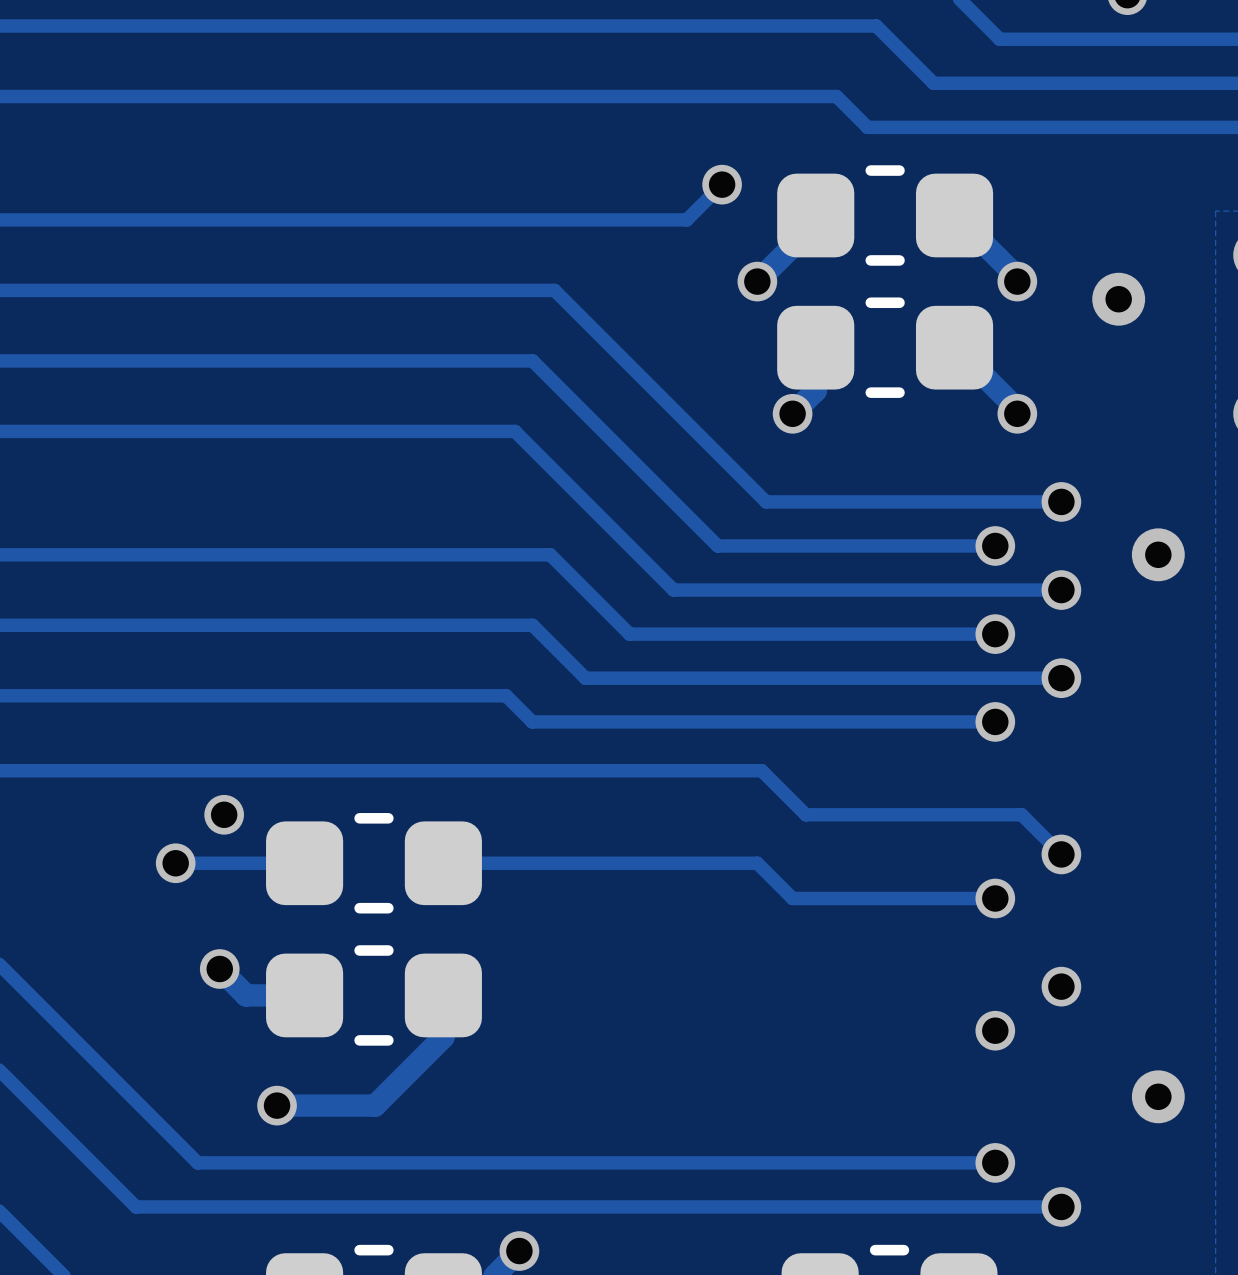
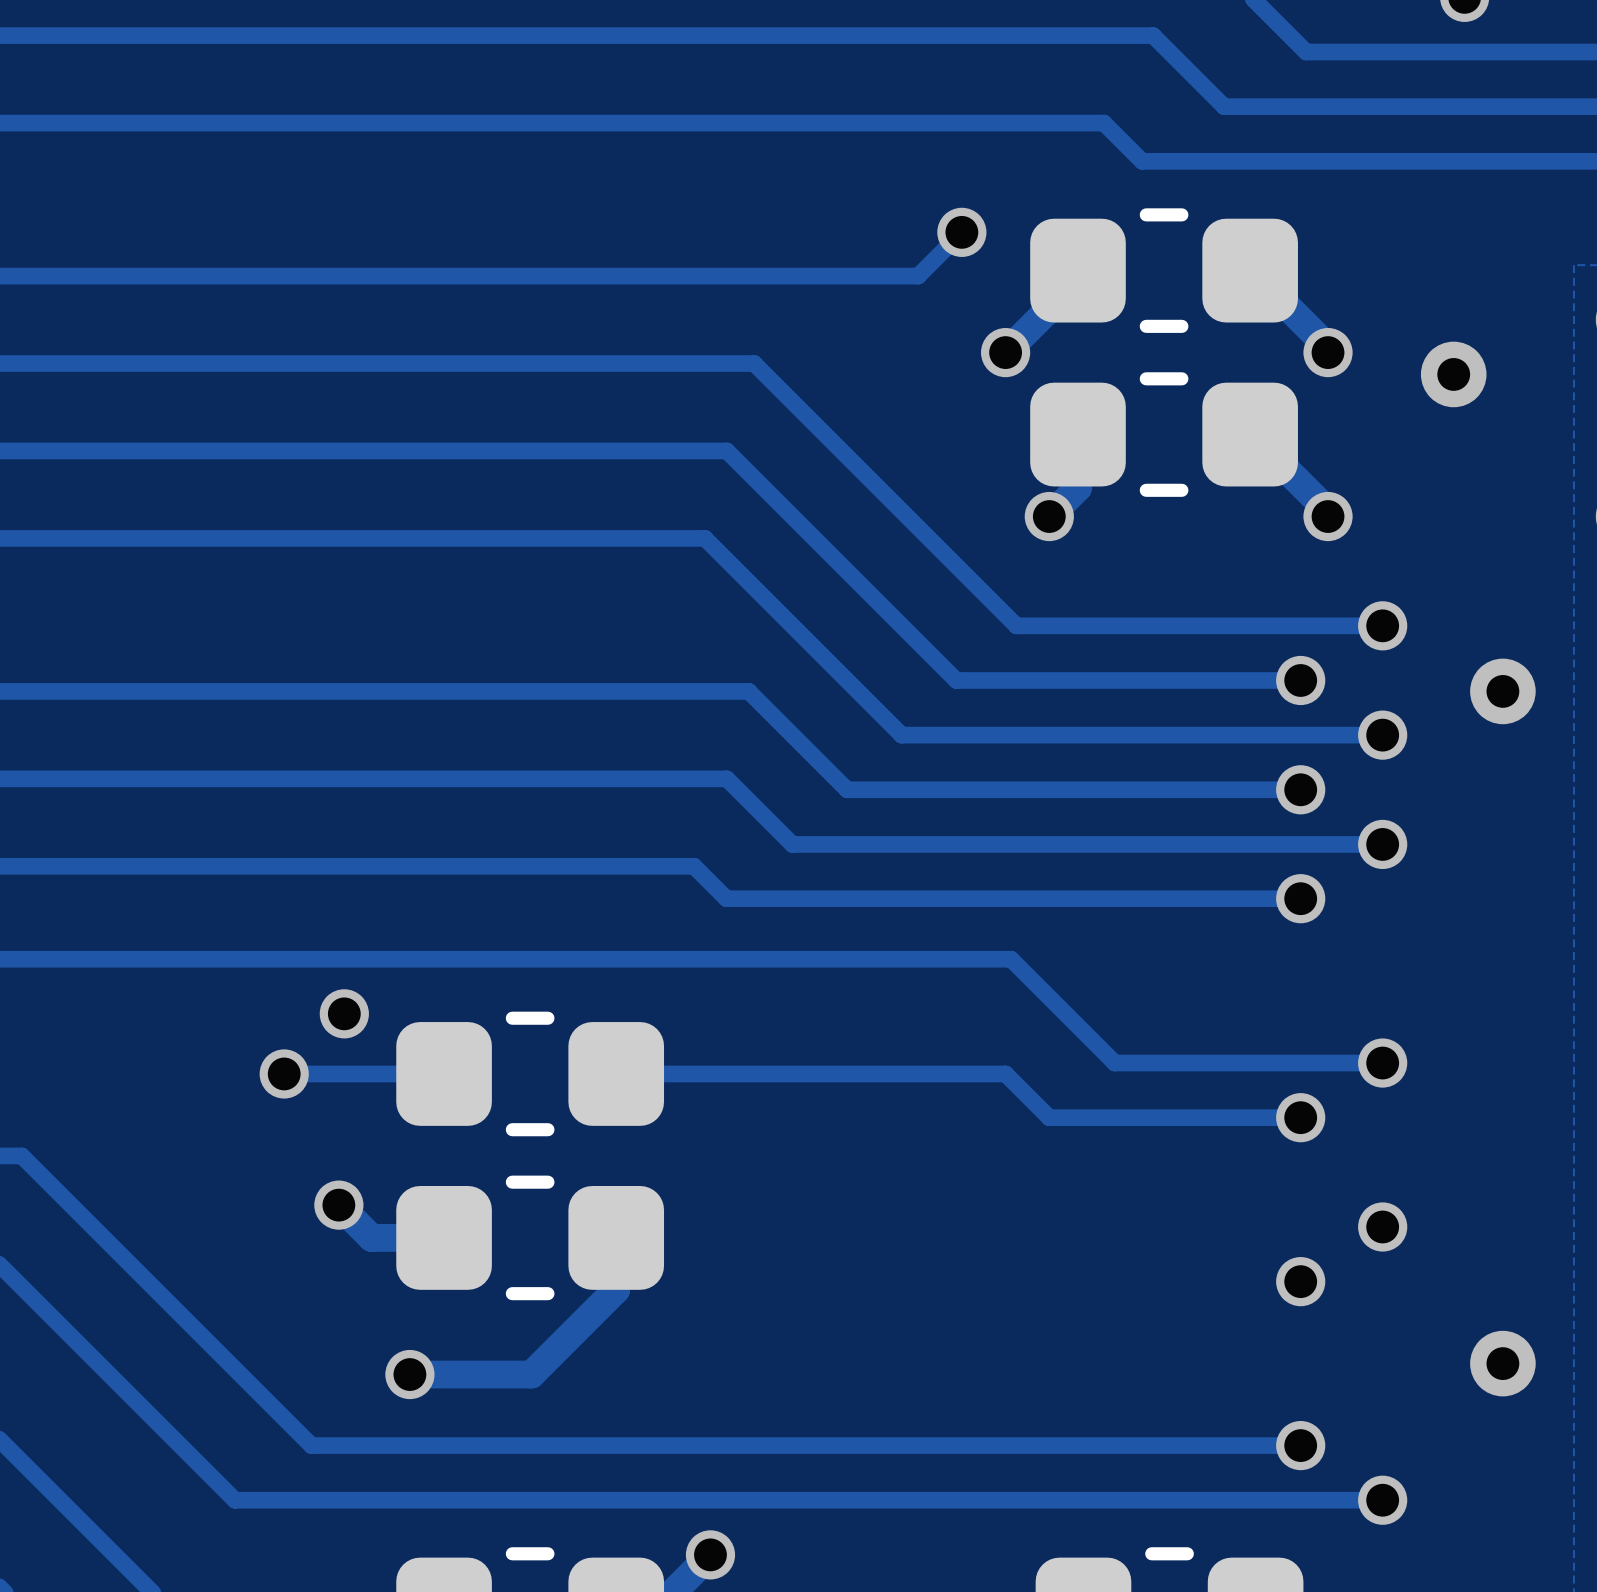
track: (805, 814) (1021, 814) (1061, 854) -> (1065, 1013) (1114, 1063) (1382, 1063)

